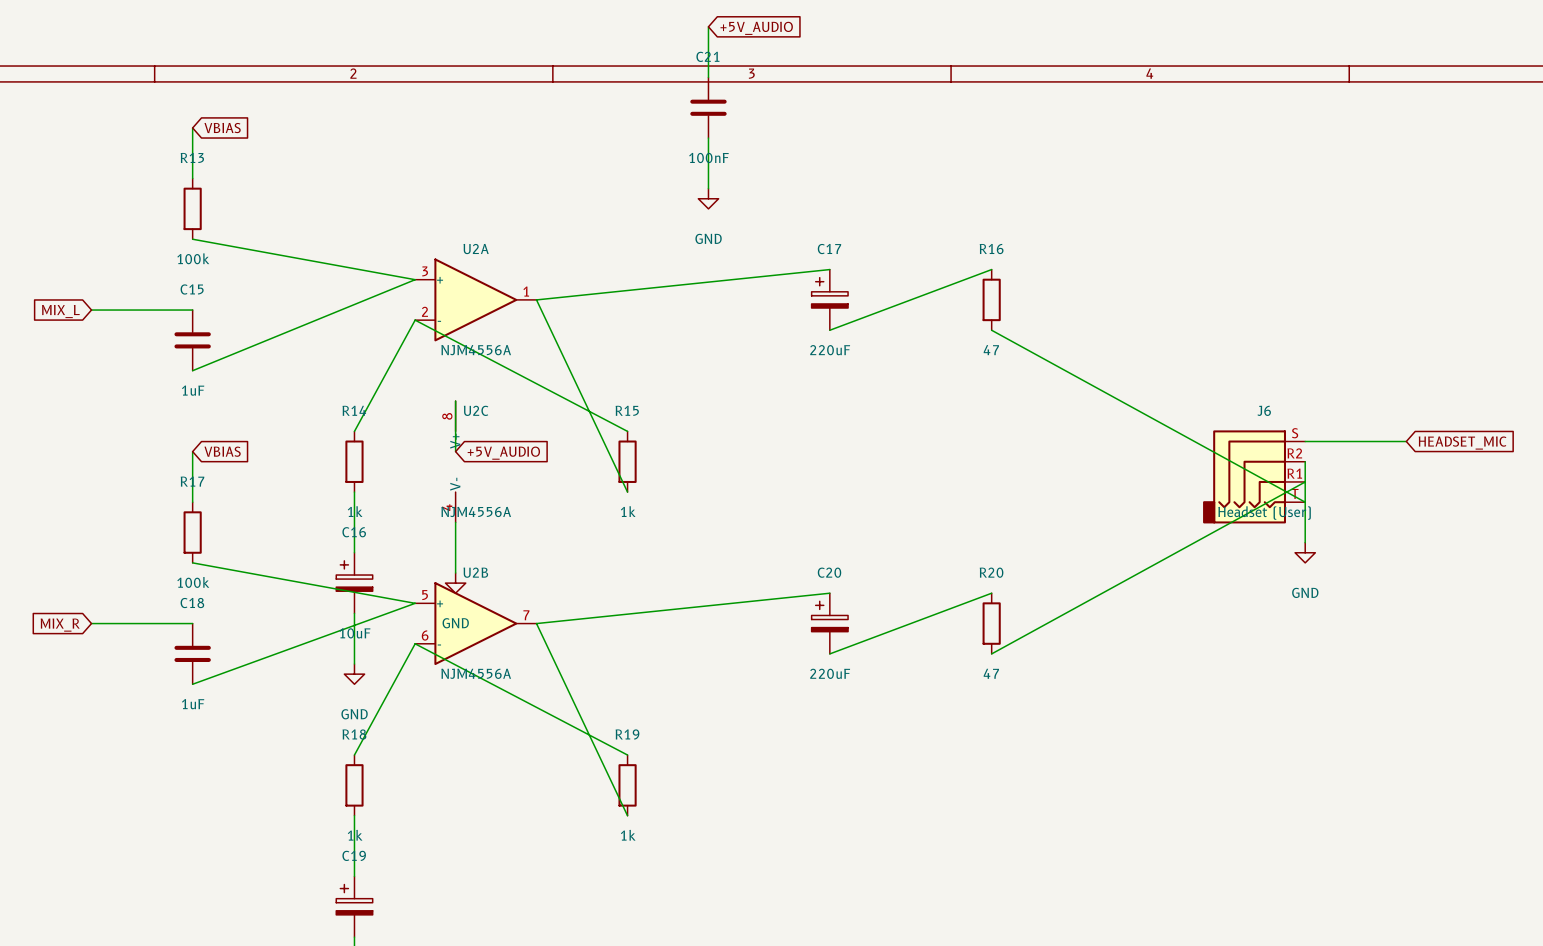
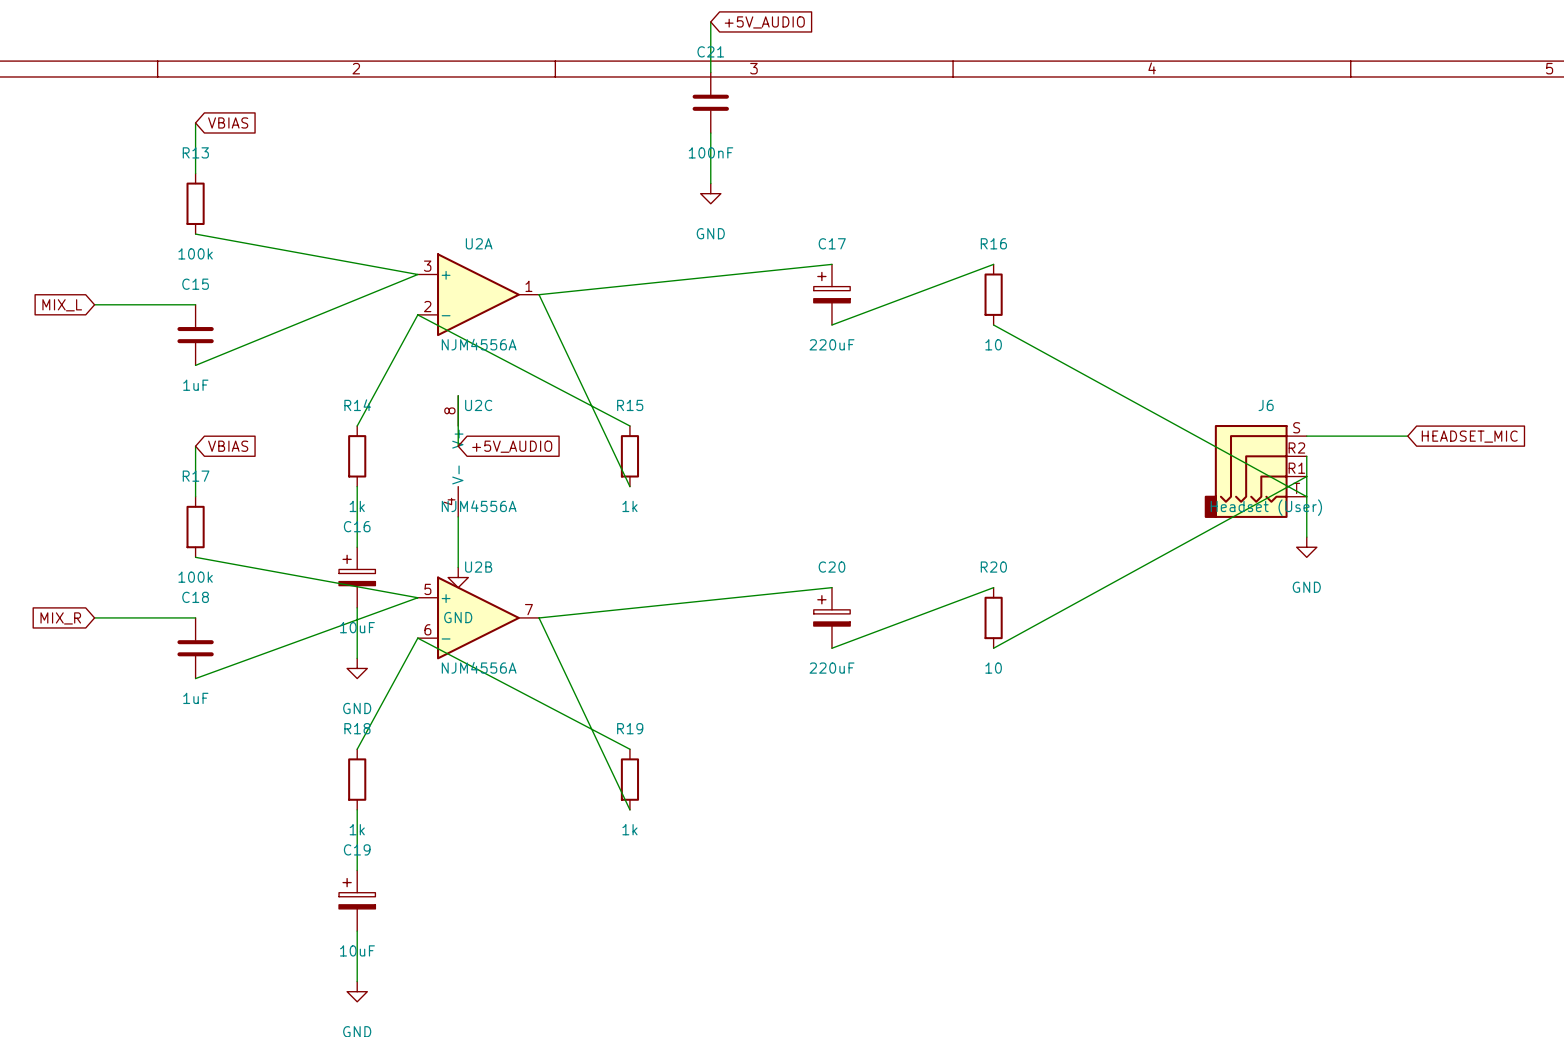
R16 value: 47 (991, 350) -> 10 (993, 344)
R20 value: 47 (991, 673) -> 10 (993, 668)

